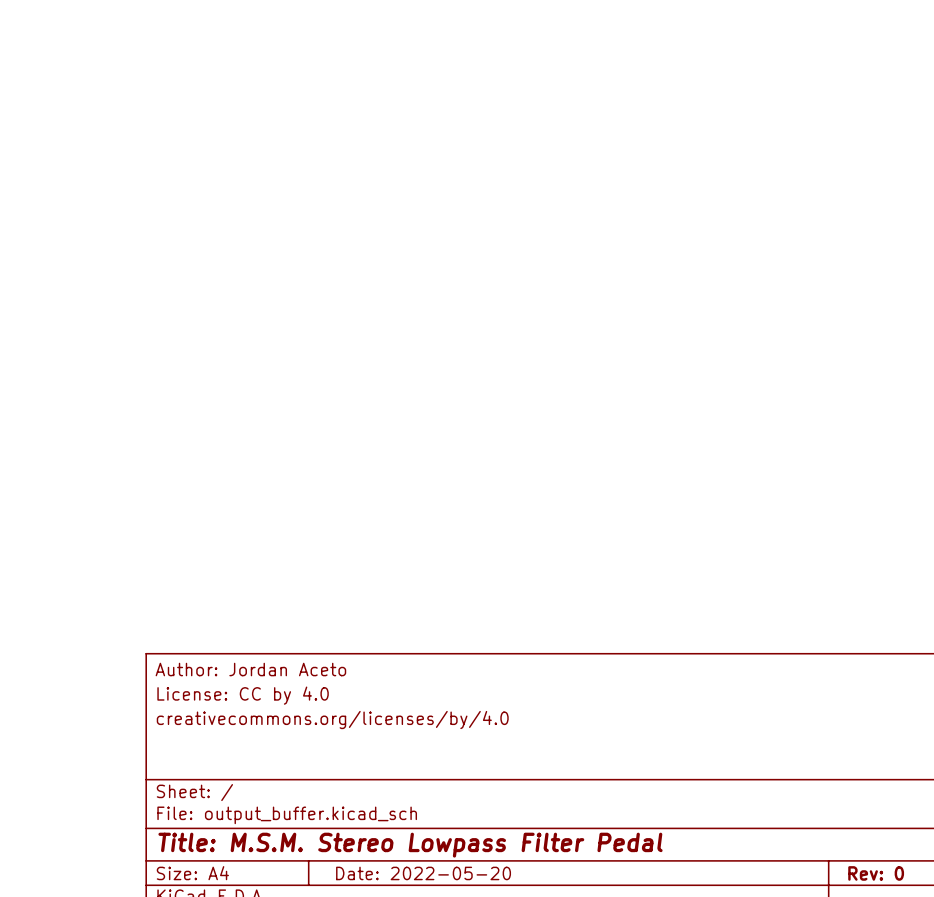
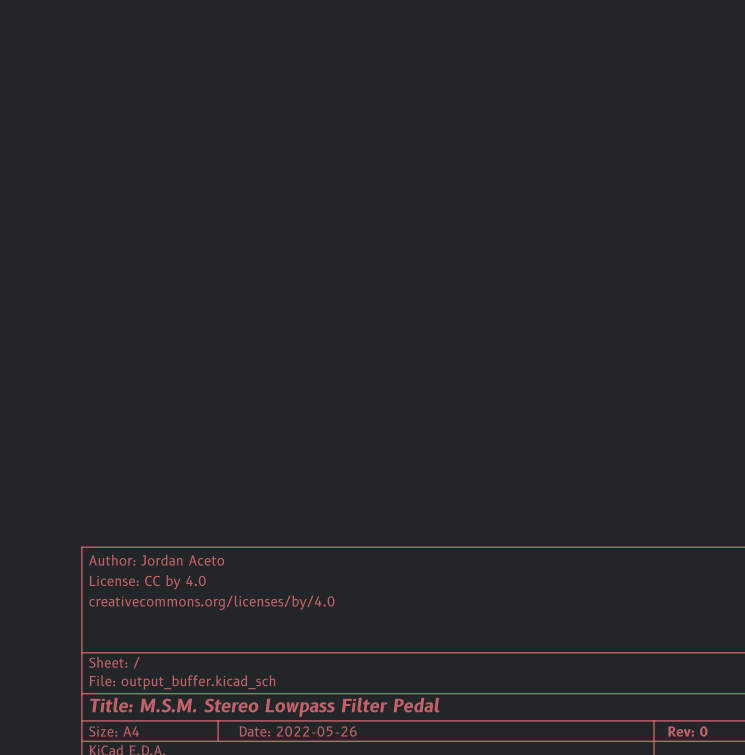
title block: Date: 2022-05-20 (423, 873) -> Date: 2022-05-26 (298, 731)

